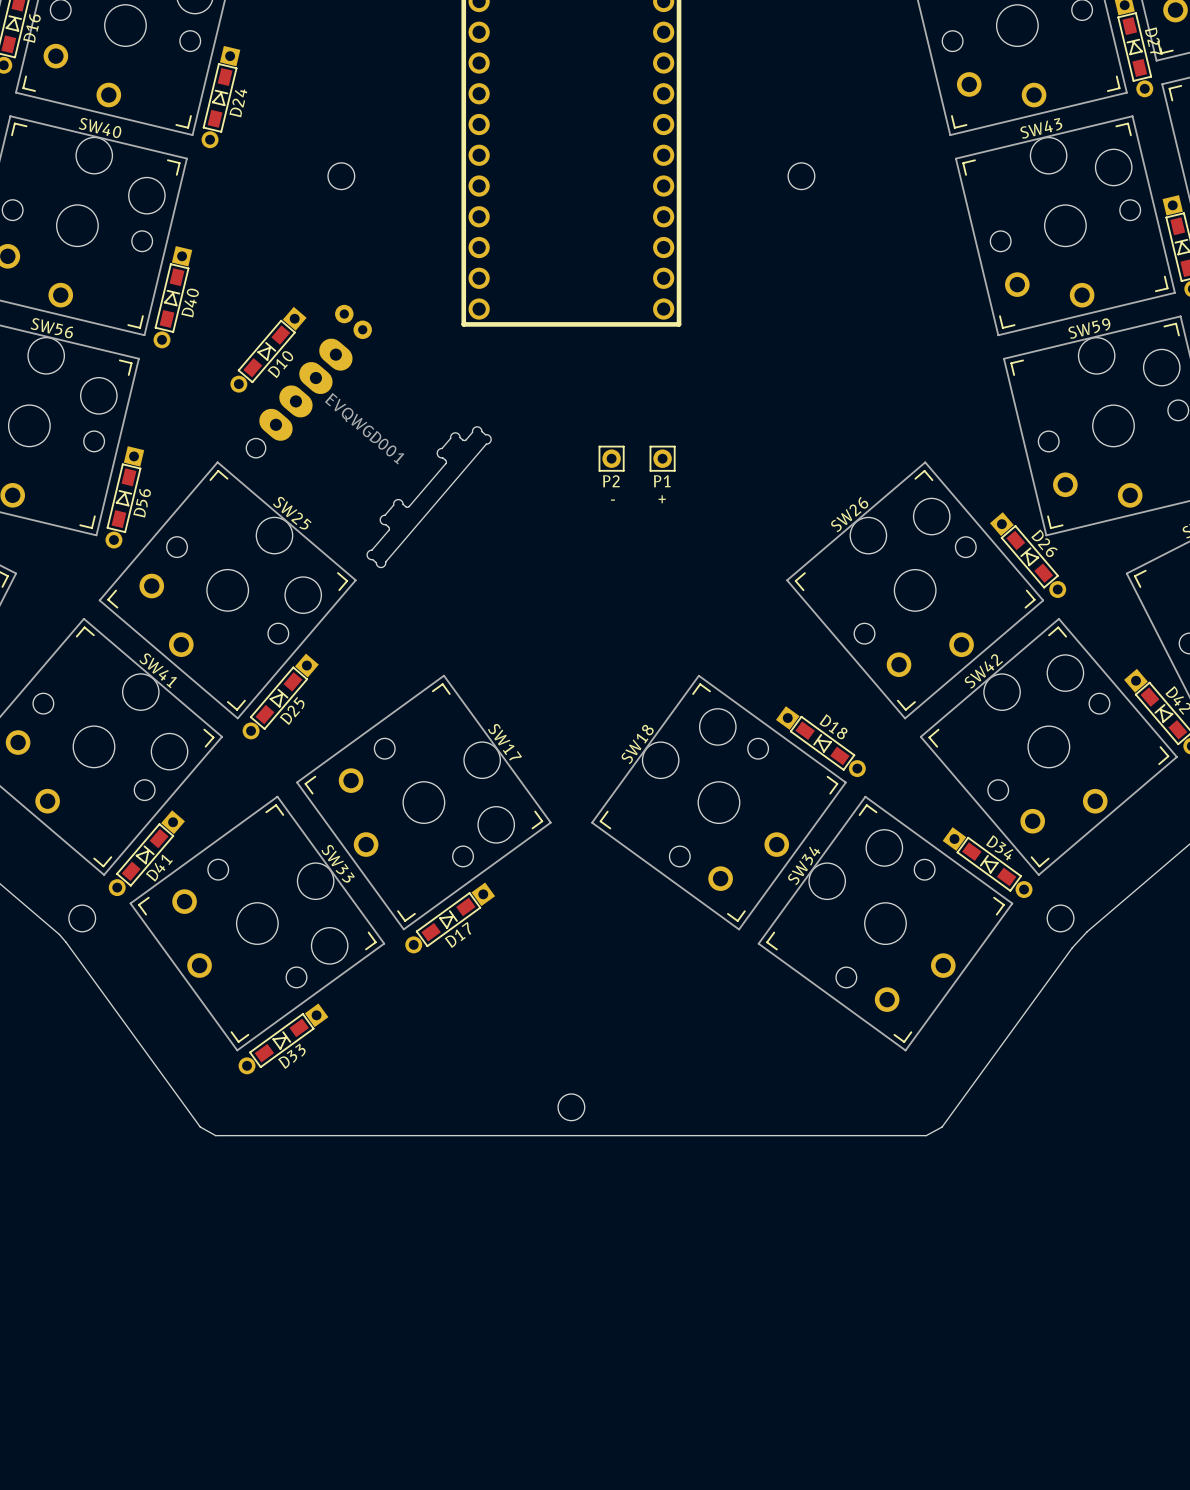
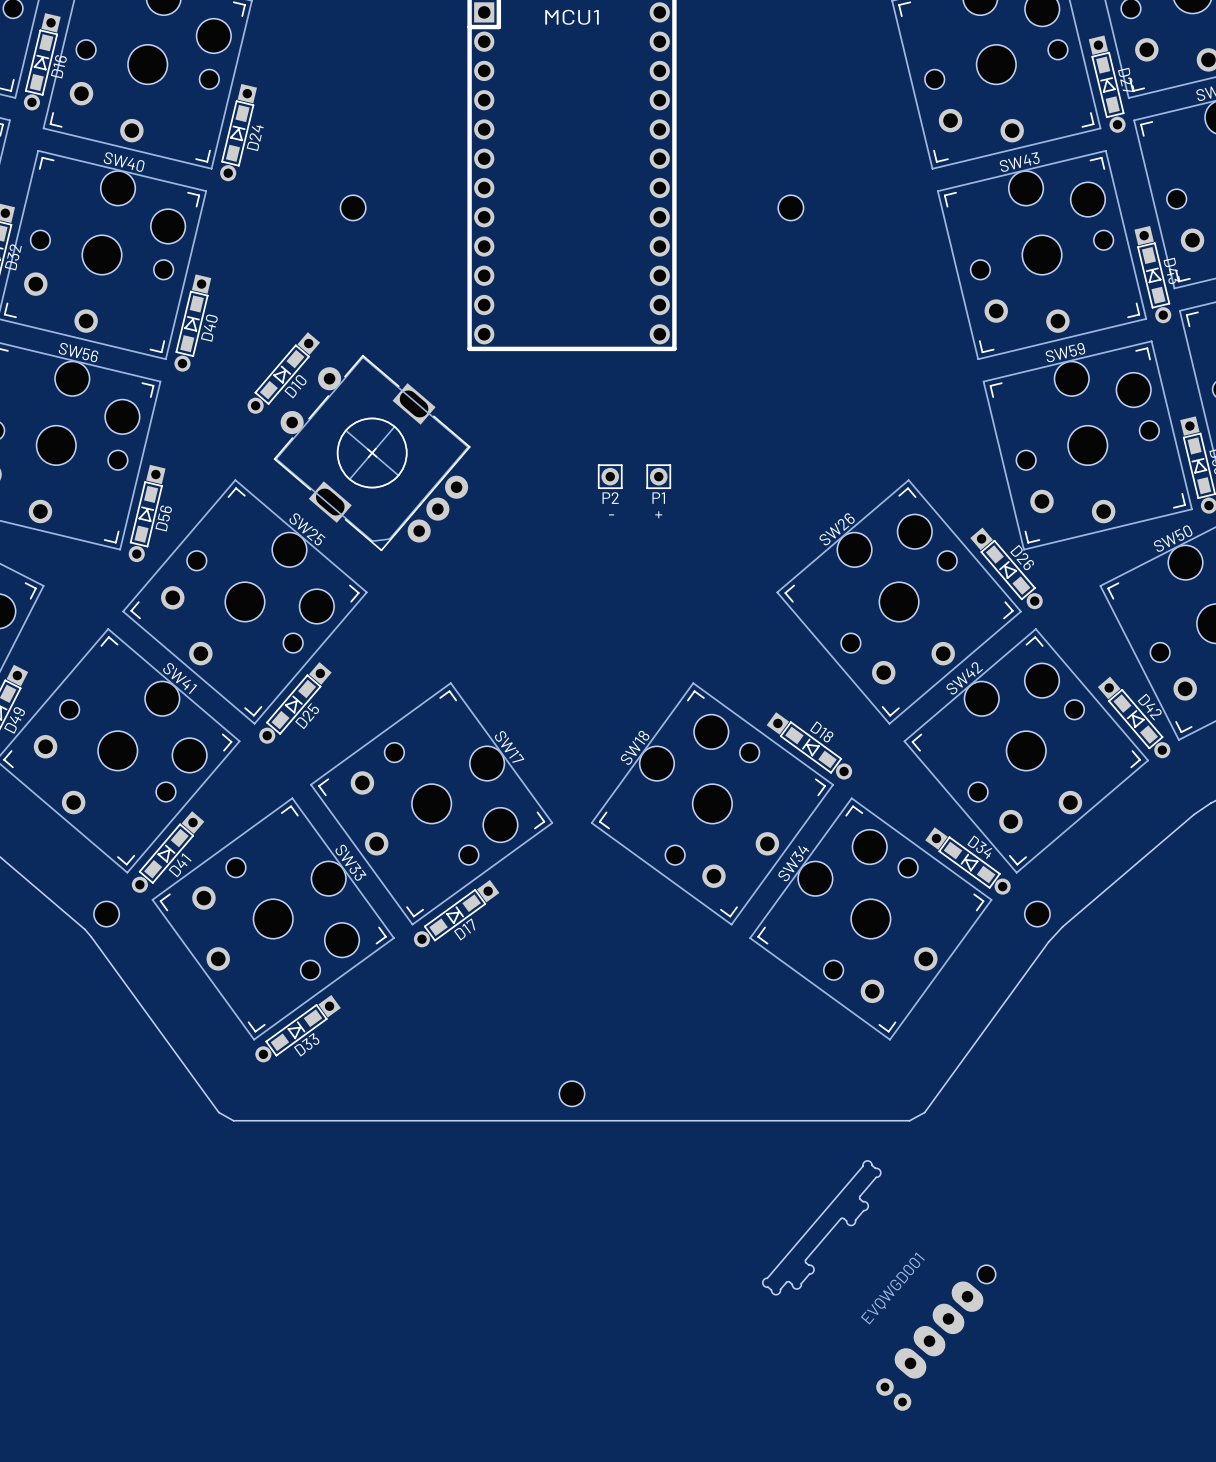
part footprint: [246, 304, 492, 568] -> [273, 354, 471, 552]
part value: EVQWGD001 (364, 428) -> none
part: none -> EVQWGD001 (879, 1285)

